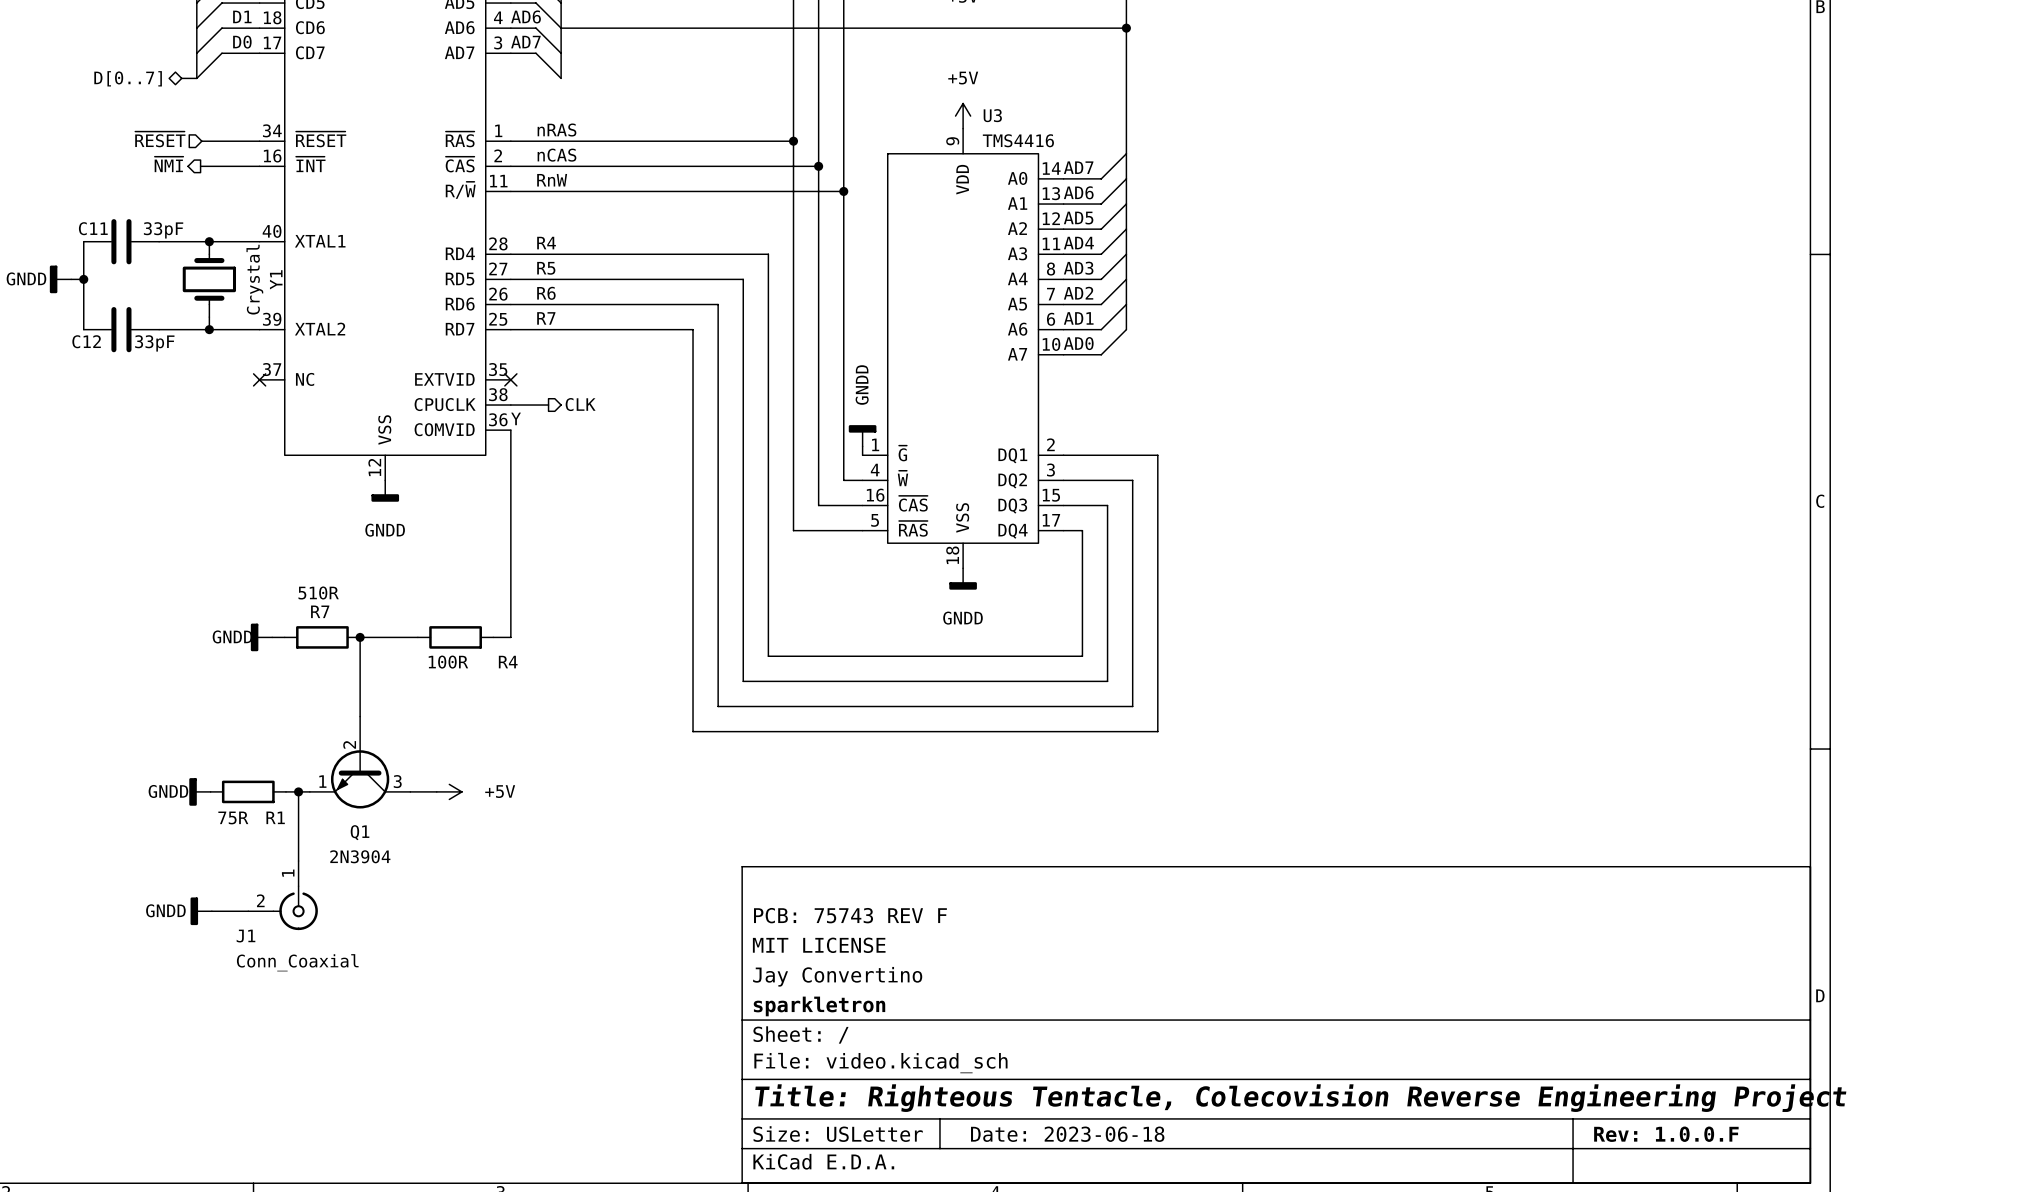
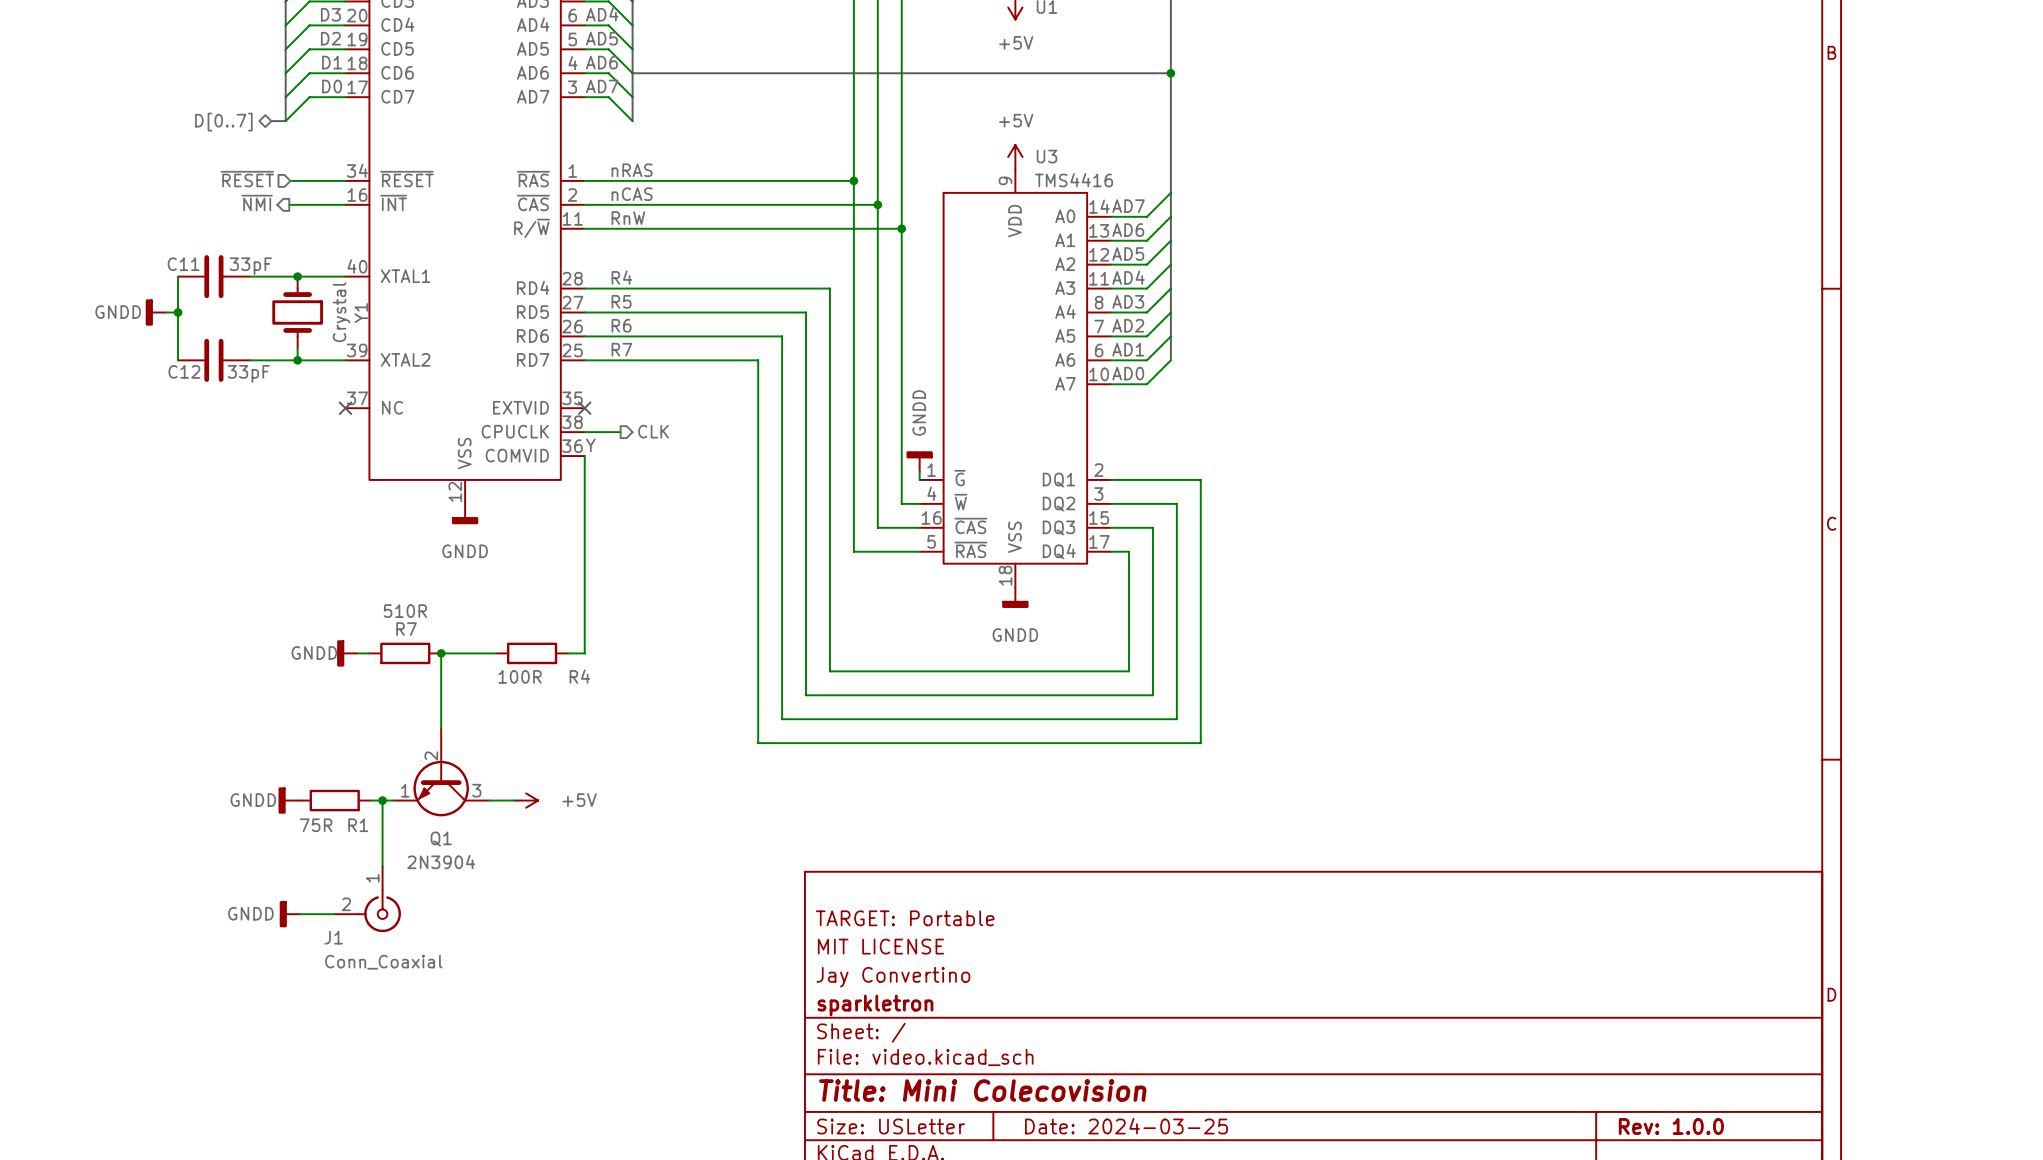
title block: PCB: 75743 REV F (850, 915) -> TARGET: Portable (905, 918)
title block: Title: Righteous Tentacle, Colecovision Reverse Engineering Project (1300, 1098) -> Title: Mini Colecovision (982, 1090)
title block: Date: 2023-06-18 (1067, 1134) -> Date: 2024-03-25 (1126, 1126)
title block: Rev: 1.0.0.F (1666, 1134) -> Rev: 1.0.0 (1671, 1126)

